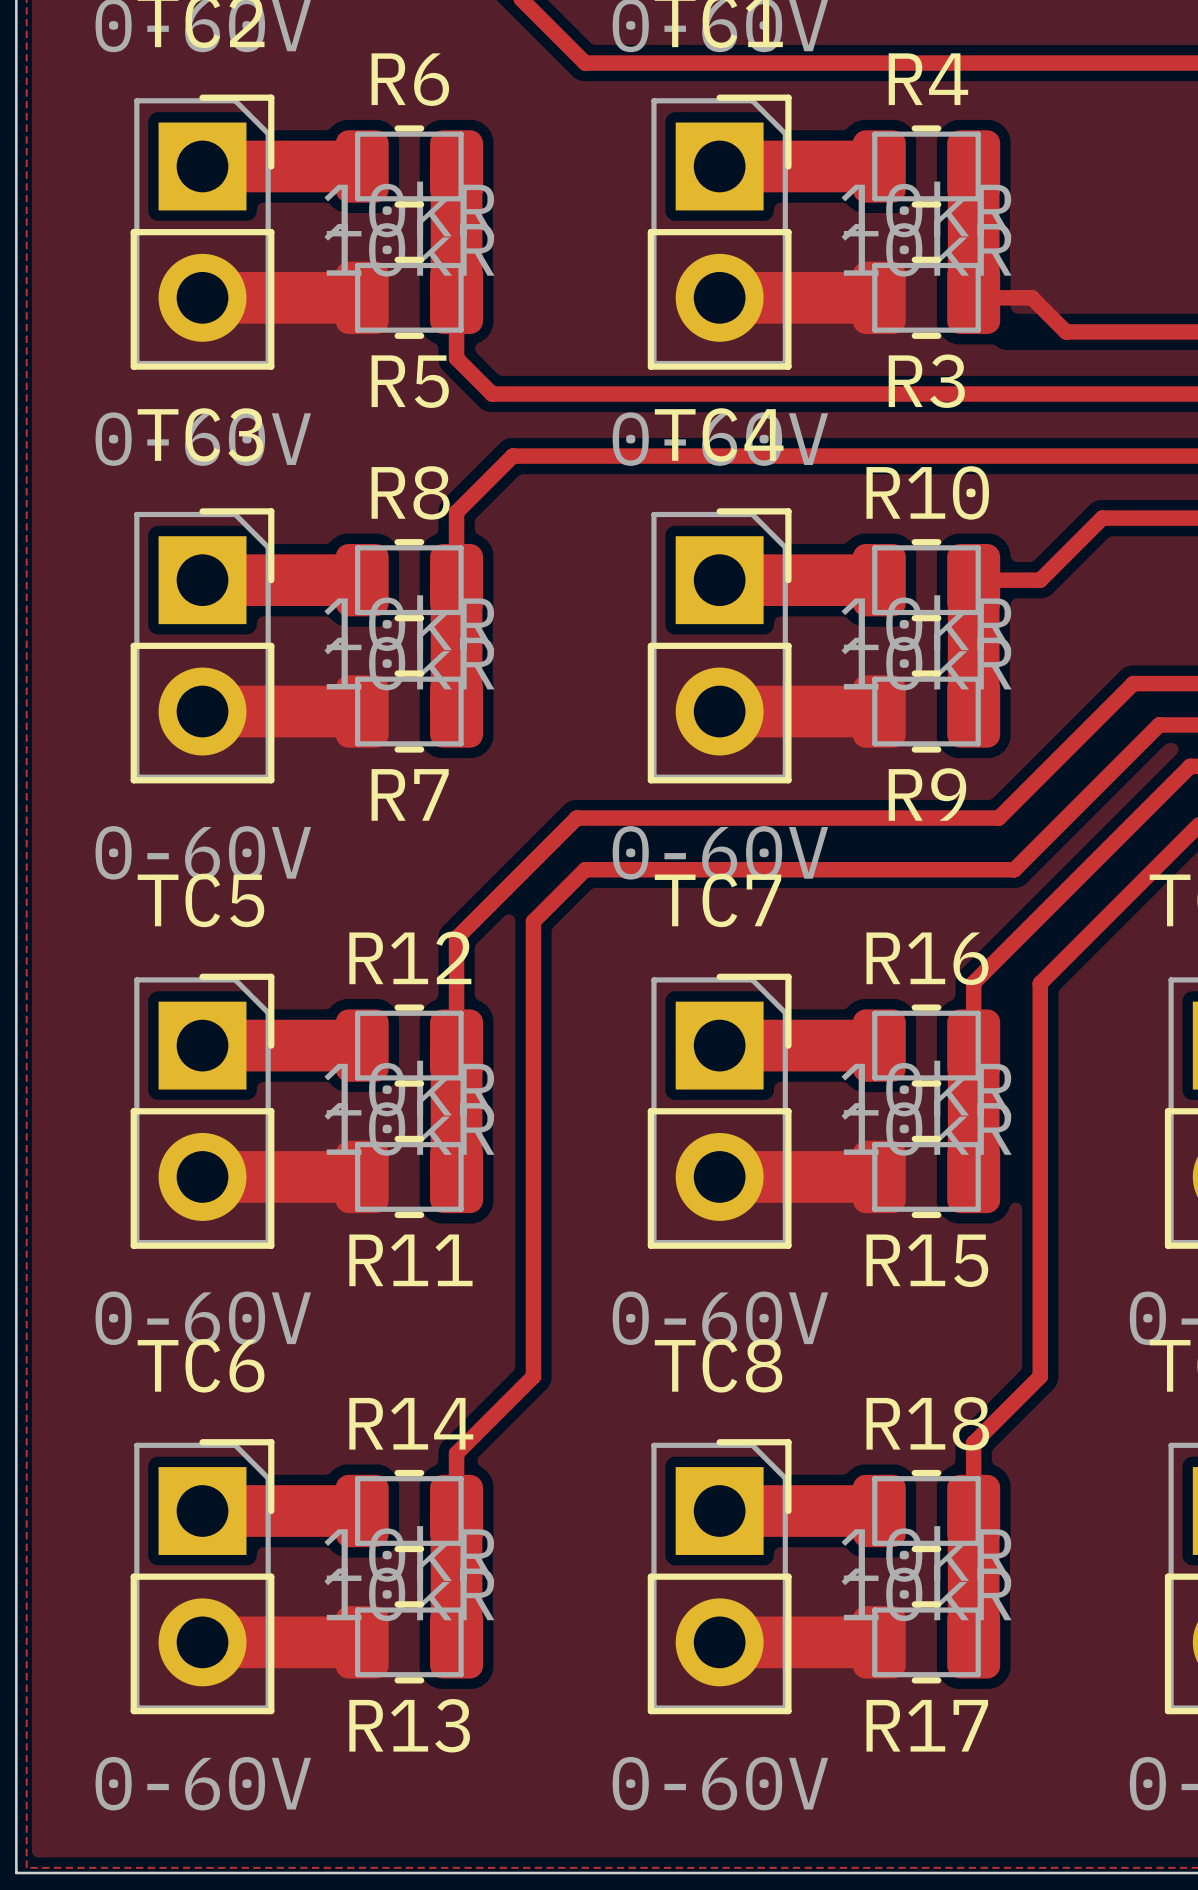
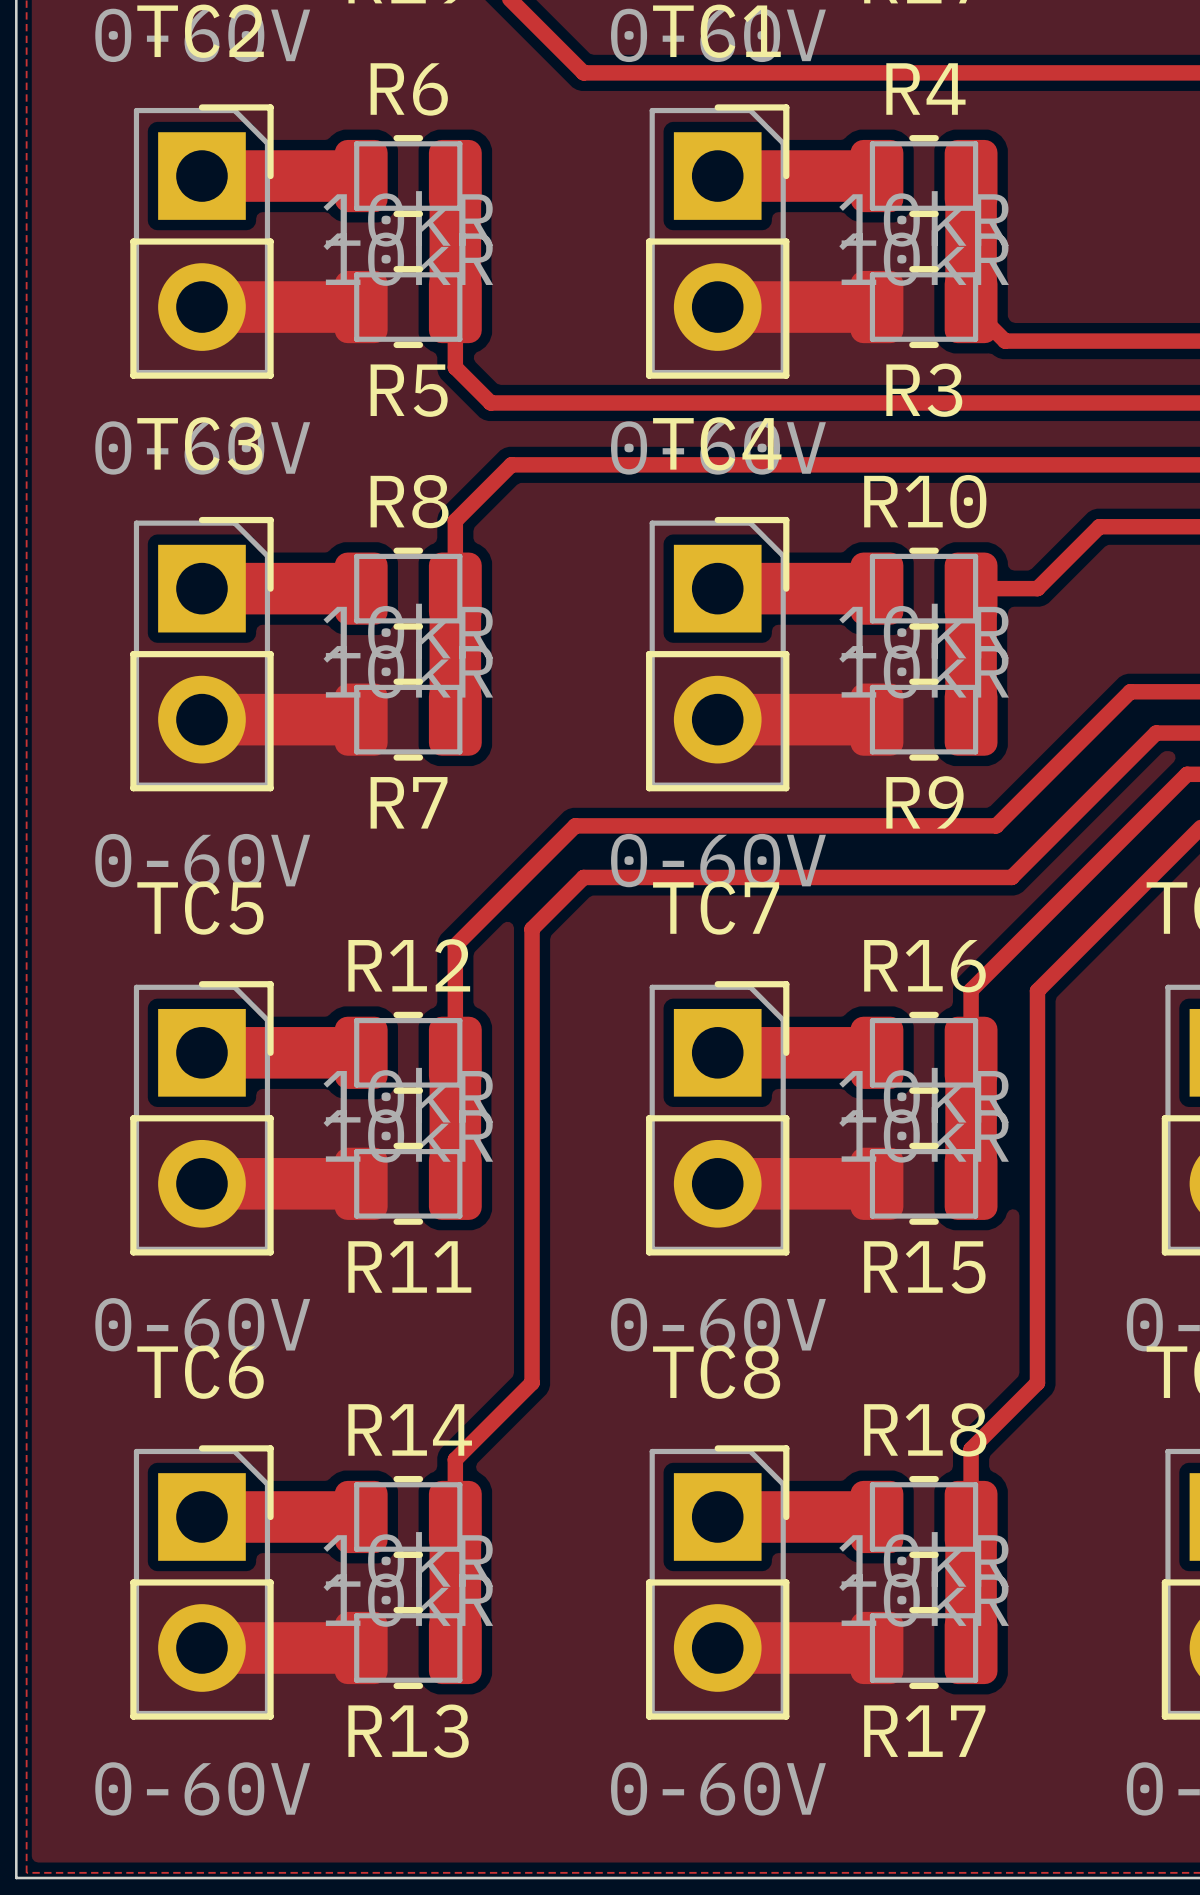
track: (973, 297) (1031, 297) (1066, 331) -> (971, 307) (1005, 341) (1063, 341)

